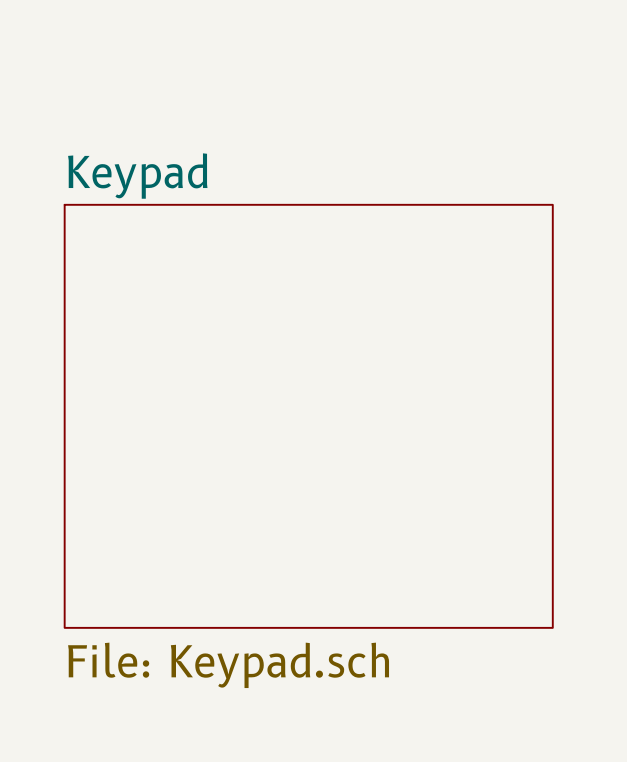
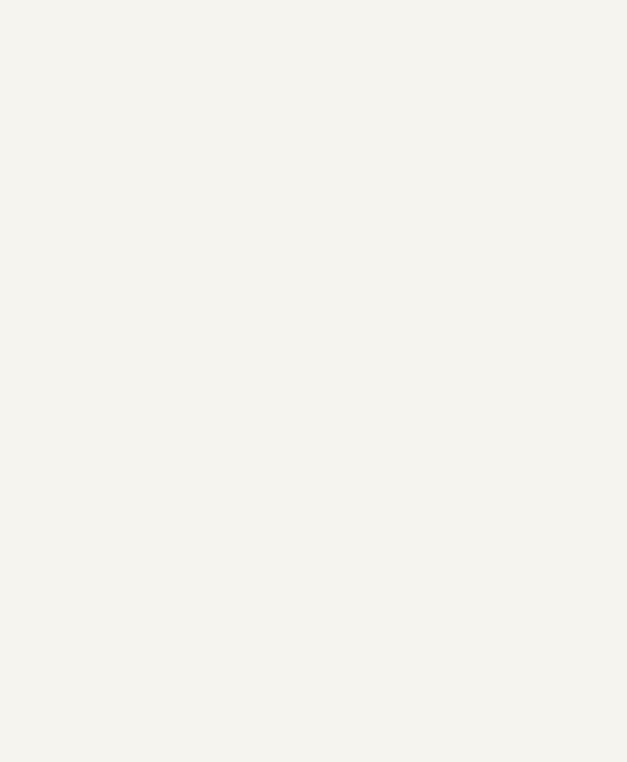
sheet Keypad: File: Keypad.sch (308, 416) -> none

